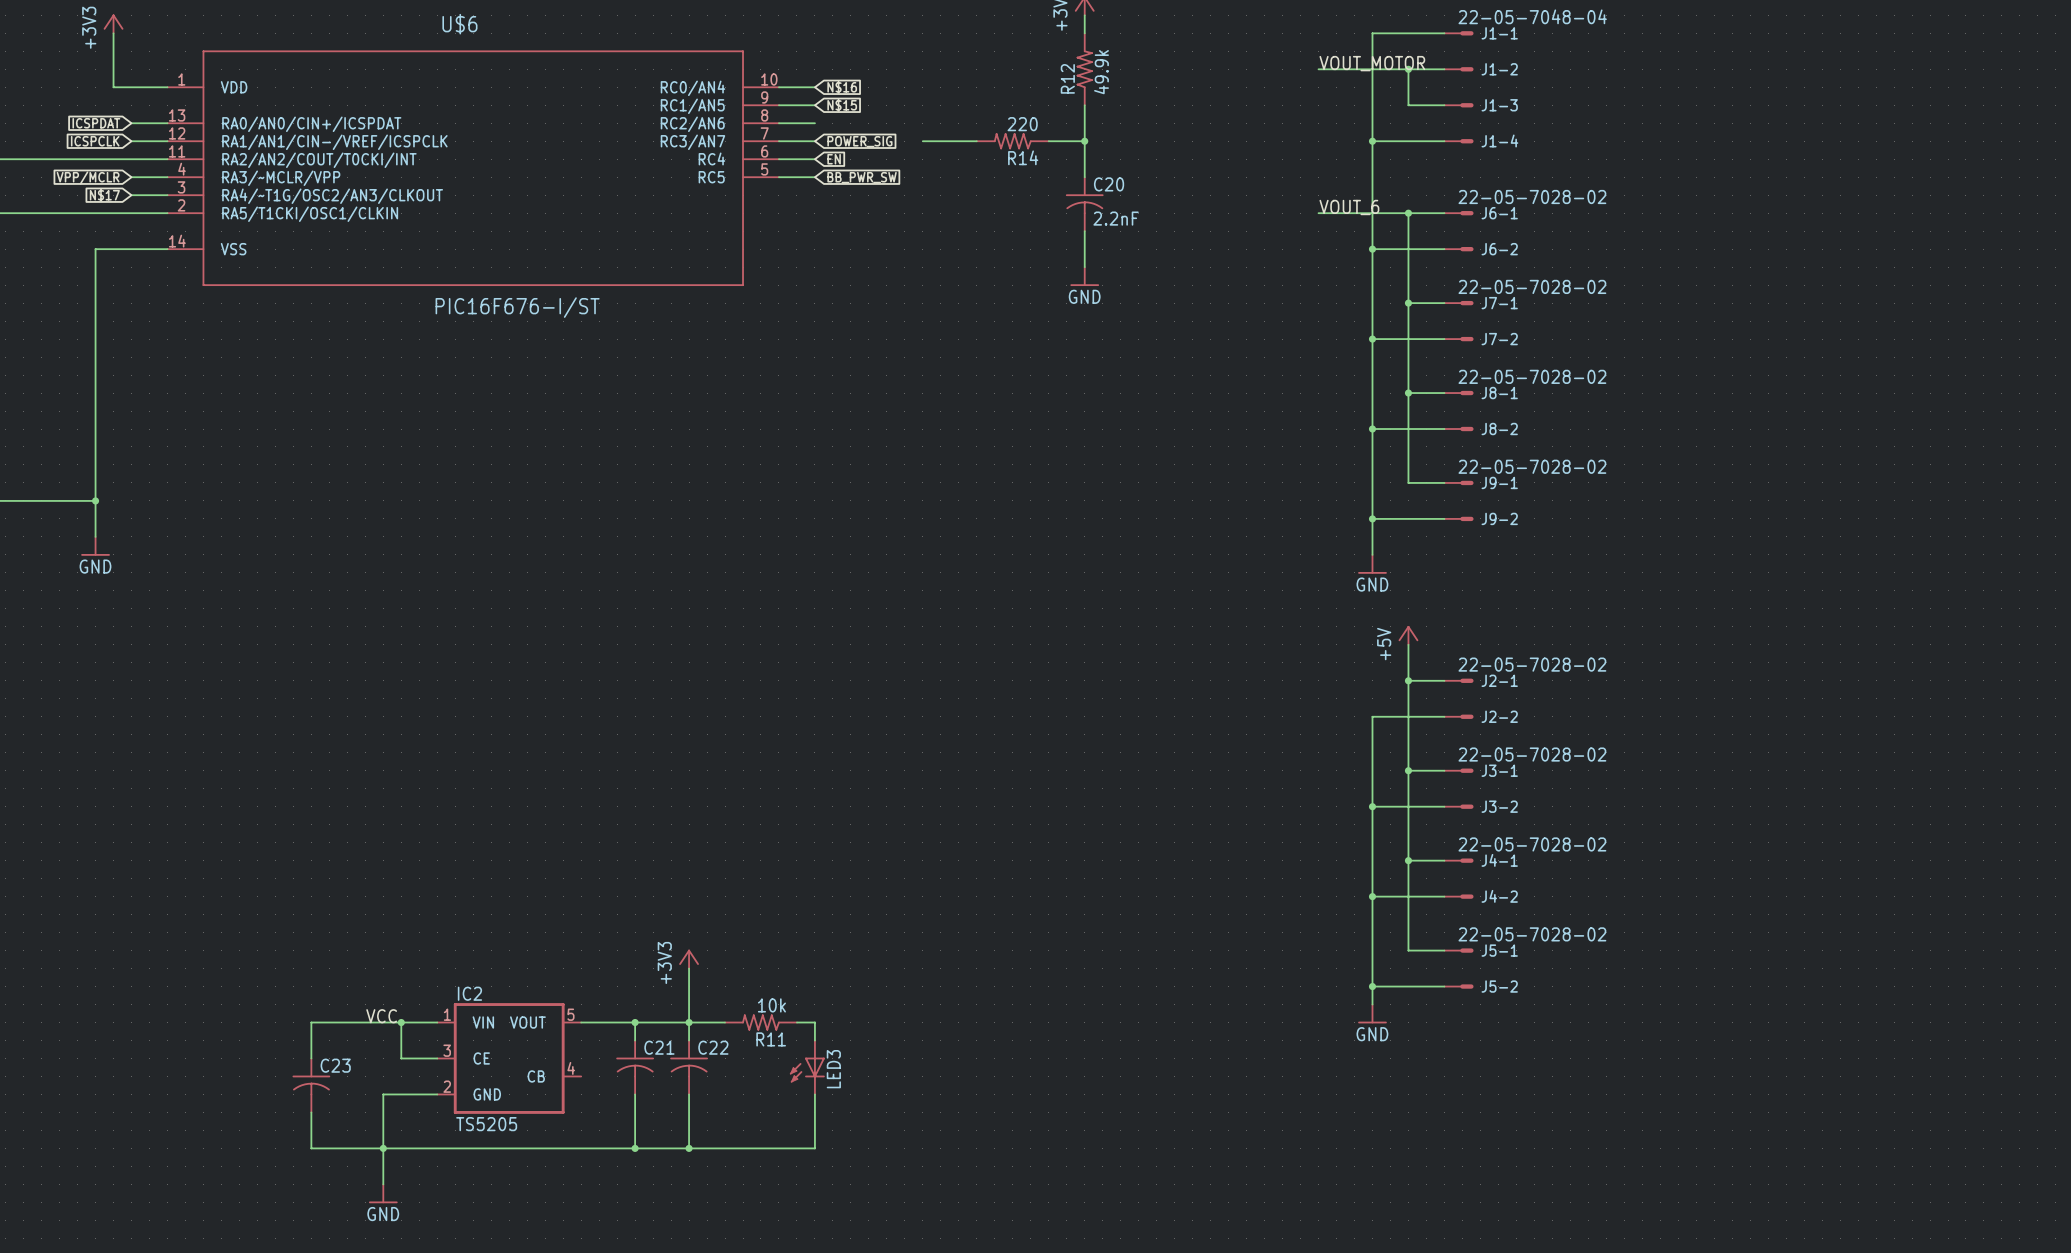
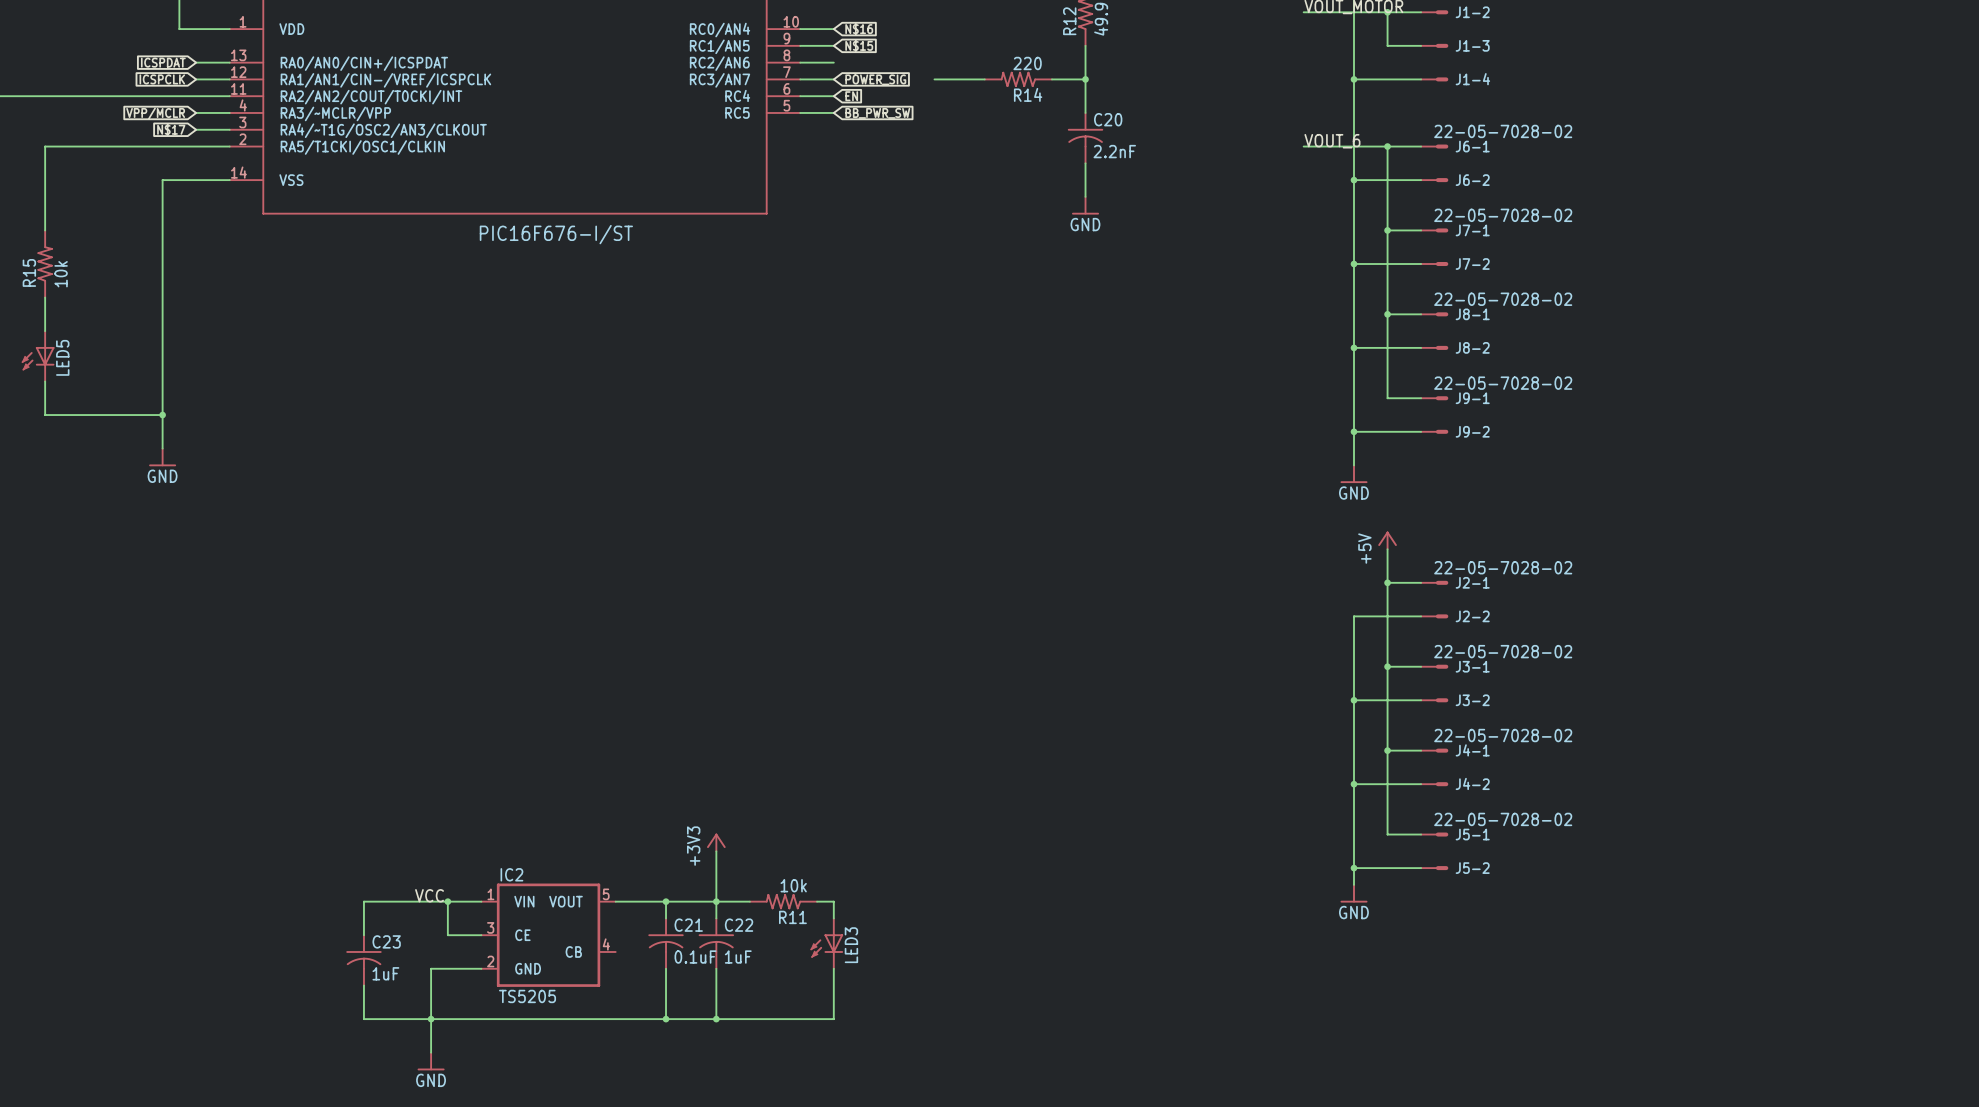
C21 value: none -> 0.1uF (695, 957)
C22 value: none -> 1uF (738, 957)
C23 value: none -> 1uF (385, 973)

